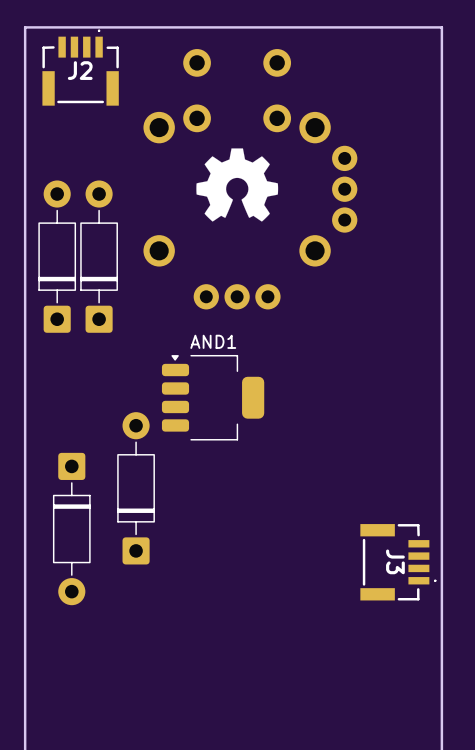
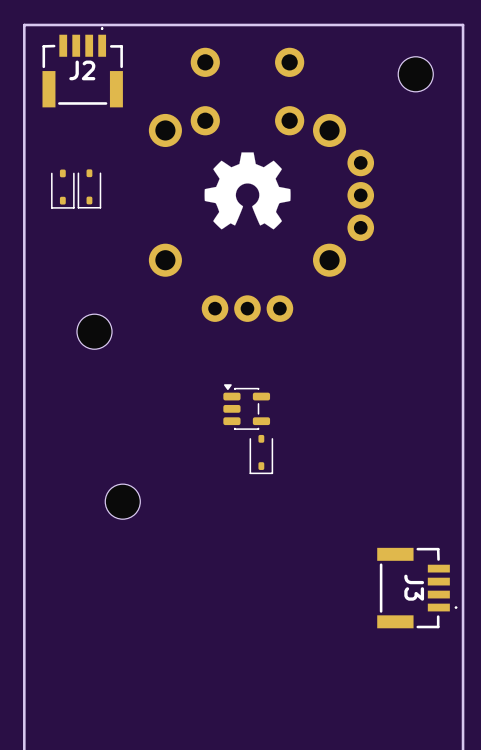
part: none -> (415, 74)
part: none -> (62, 189)
part: none -> (89, 188)
part: (57, 256) -> none
part: (99, 256) -> none
part: none -> (94, 331)
part: none -> (246, 407)
AND1: (213, 397) -> none
part: none -> (261, 454)
part: none -> (122, 501)
part: (136, 488) -> none
part: (71, 529) -> none

